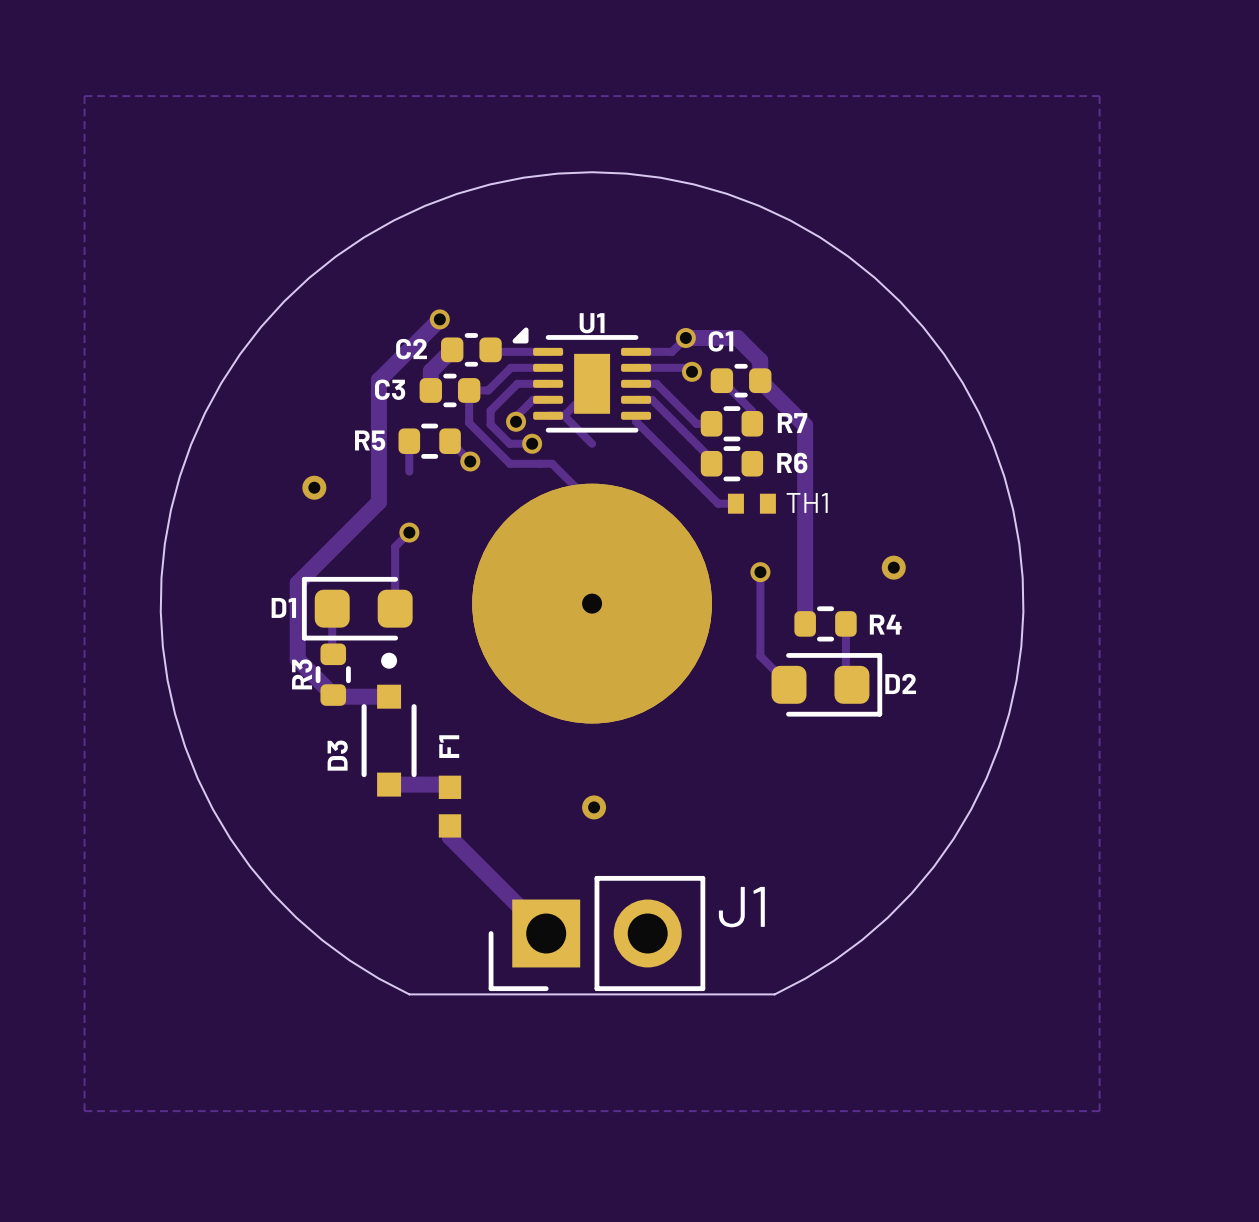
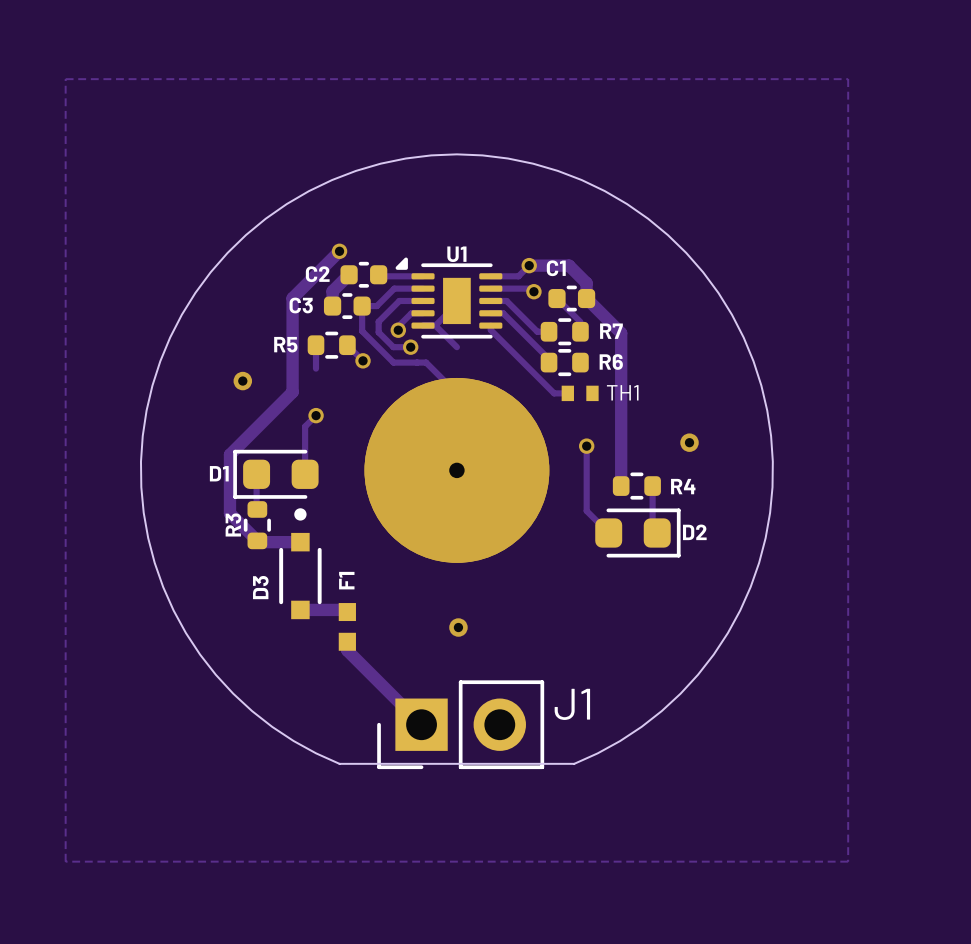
board edge: (409, 994) (774, 994) (834, 960) (861, 940) (911, 893) (953, 838) (986, 778) (999, 746) (1016, 680) (1023, 612) (1019, 543) (1004, 476) (993, 444) (962, 383) (923, 327) (900, 301) (875, 278) (820, 237) (759, 205) (694, 184) (660, 177) (592, 172) (523, 177) (457, 193) (425, 205) (364, 237) (335, 256) (284, 301) (261, 327) (221, 383) (191, 444) (170, 510) (161, 577) (160, 612) (167, 680) (185, 746) (197, 778) (230, 838) (272, 893) (296, 917) (349, 960) (409, 994) -> (339, 763) (293, 741) (272, 726) (233, 693) (200, 654) (173, 610) (163, 587) (148, 538) (143, 512) (140, 461) (146, 410) (152, 385) (170, 337) (195, 292) (210, 272) (245, 235) (286, 204) (332, 180) (356, 170) (380, 163) (431, 155) (482, 155) (533, 163) (581, 180) (627, 204) (667, 235) (686, 252) (718, 292) (743, 337) (753, 361) (767, 410) (772, 461) (772, 487) (765, 538) (750, 587) (740, 610) (713, 654) (680, 693) (661, 711) (620, 741) (574, 763) (339, 763)

